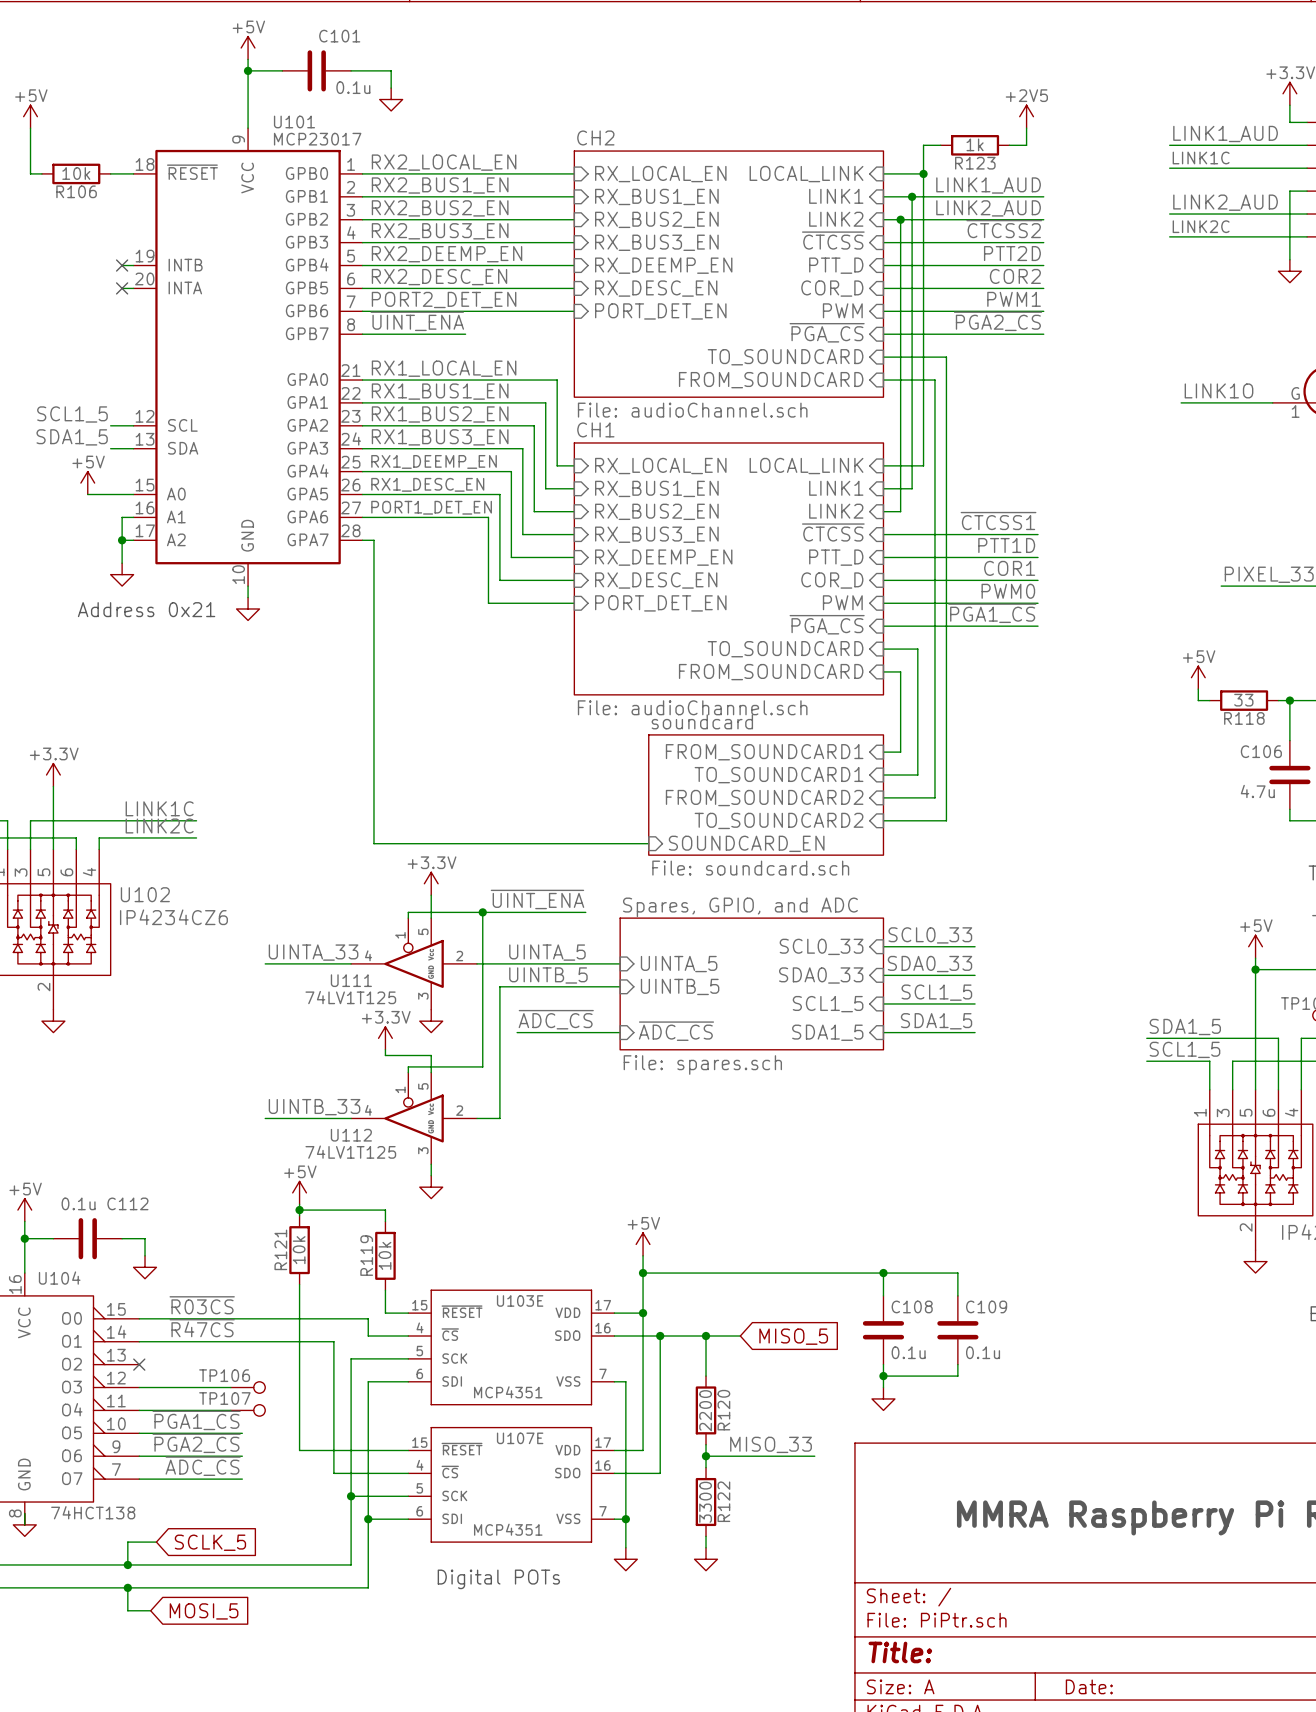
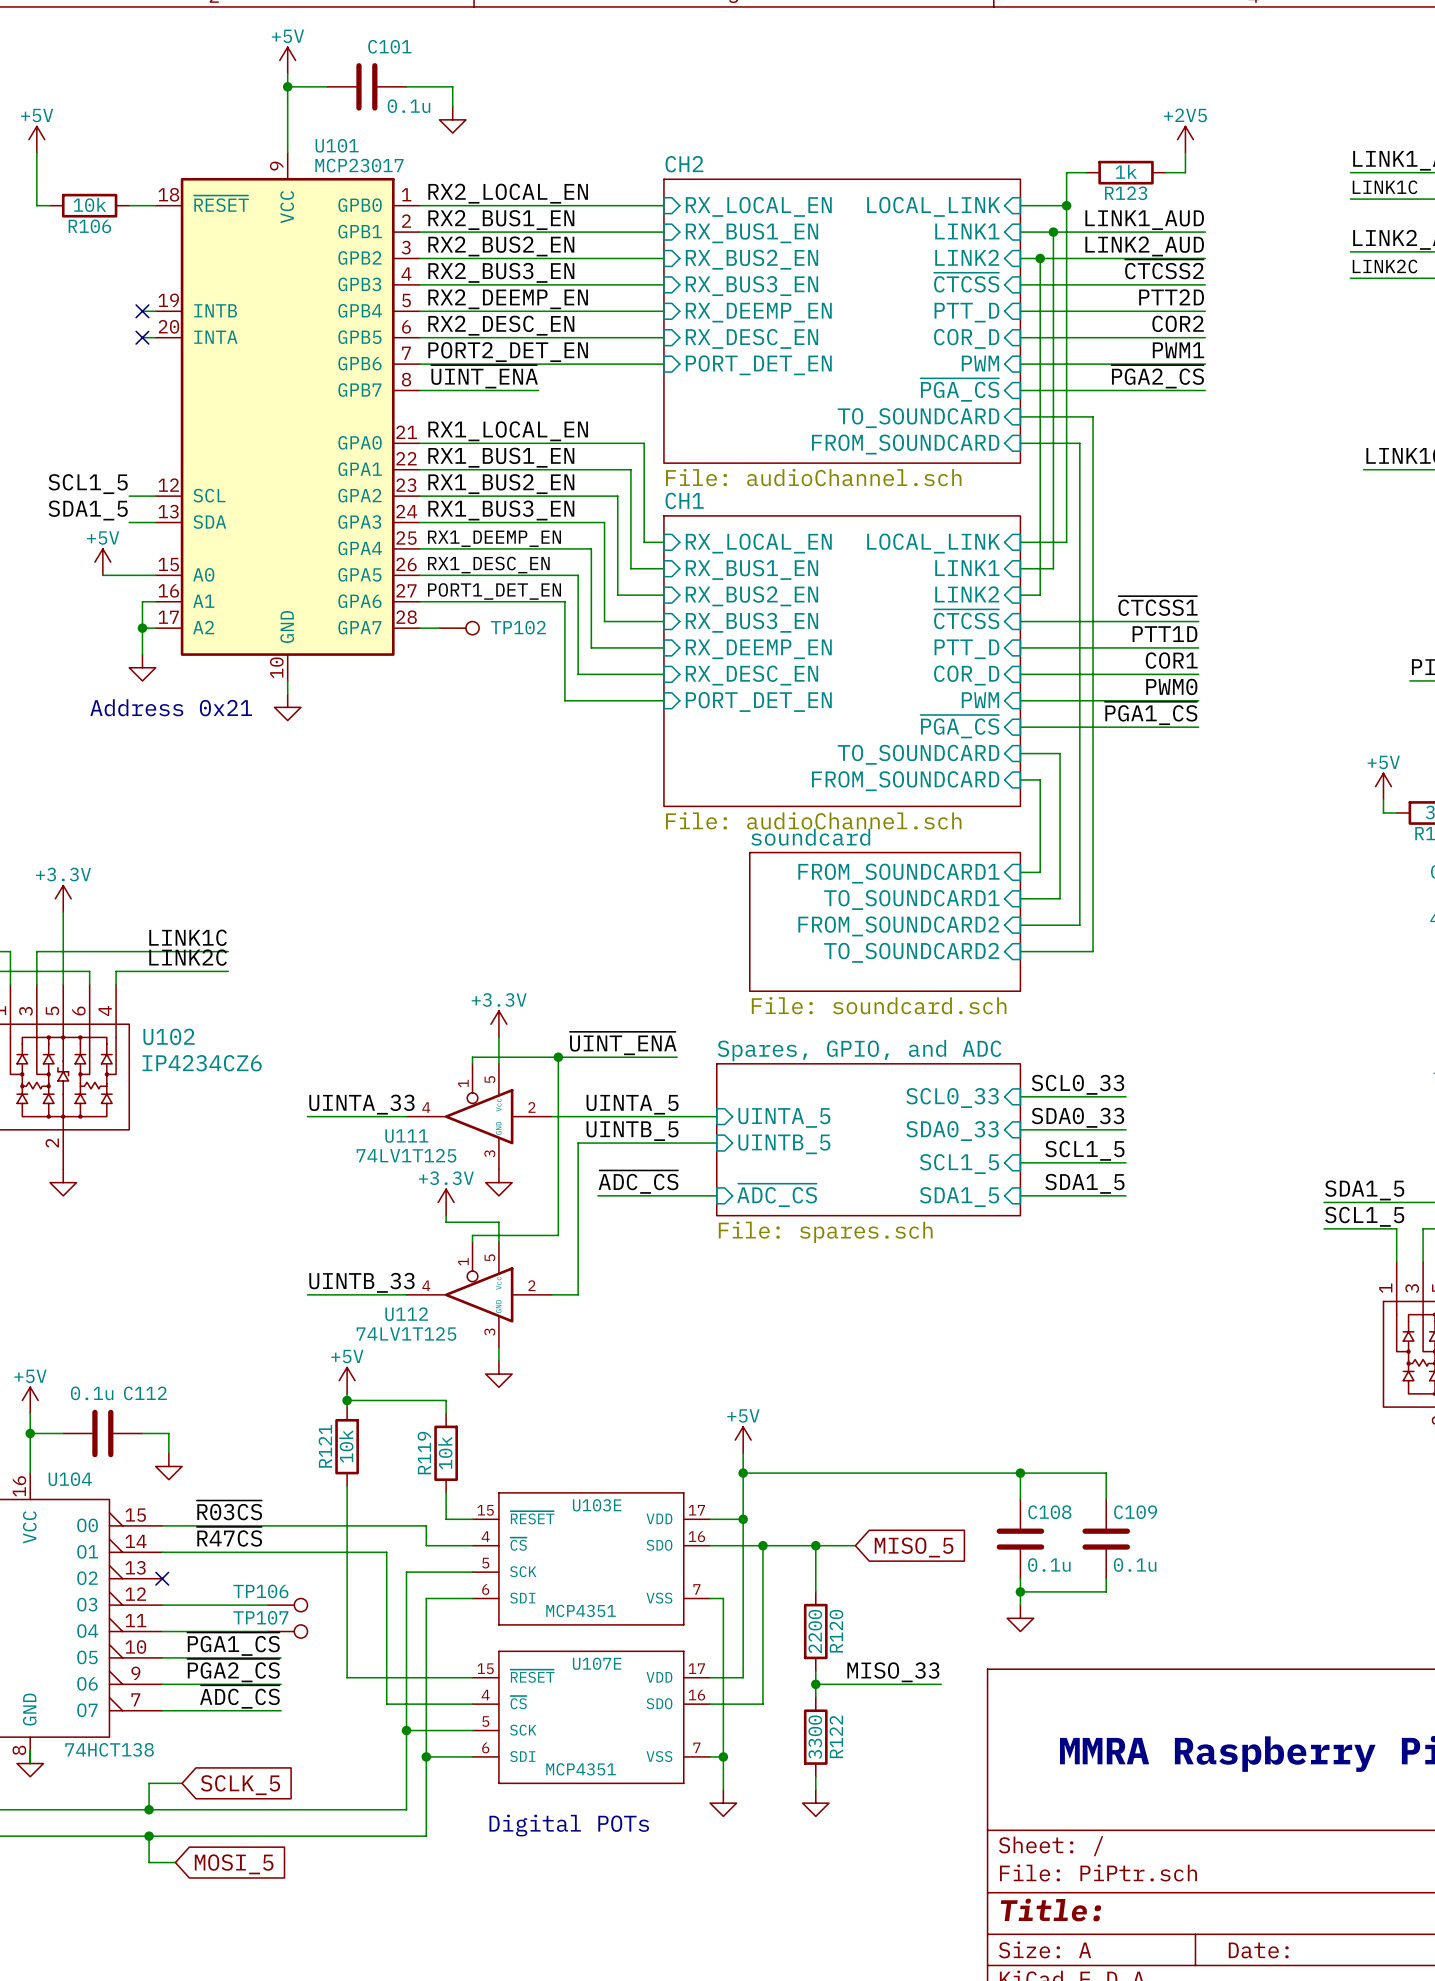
wire: (373, 540) (373, 843) (648, 843) -> (432, 628) (439, 628)
TP102: none -> (459, 628)
sheet pin: SOUNDCARD_EN (746, 843) -> none

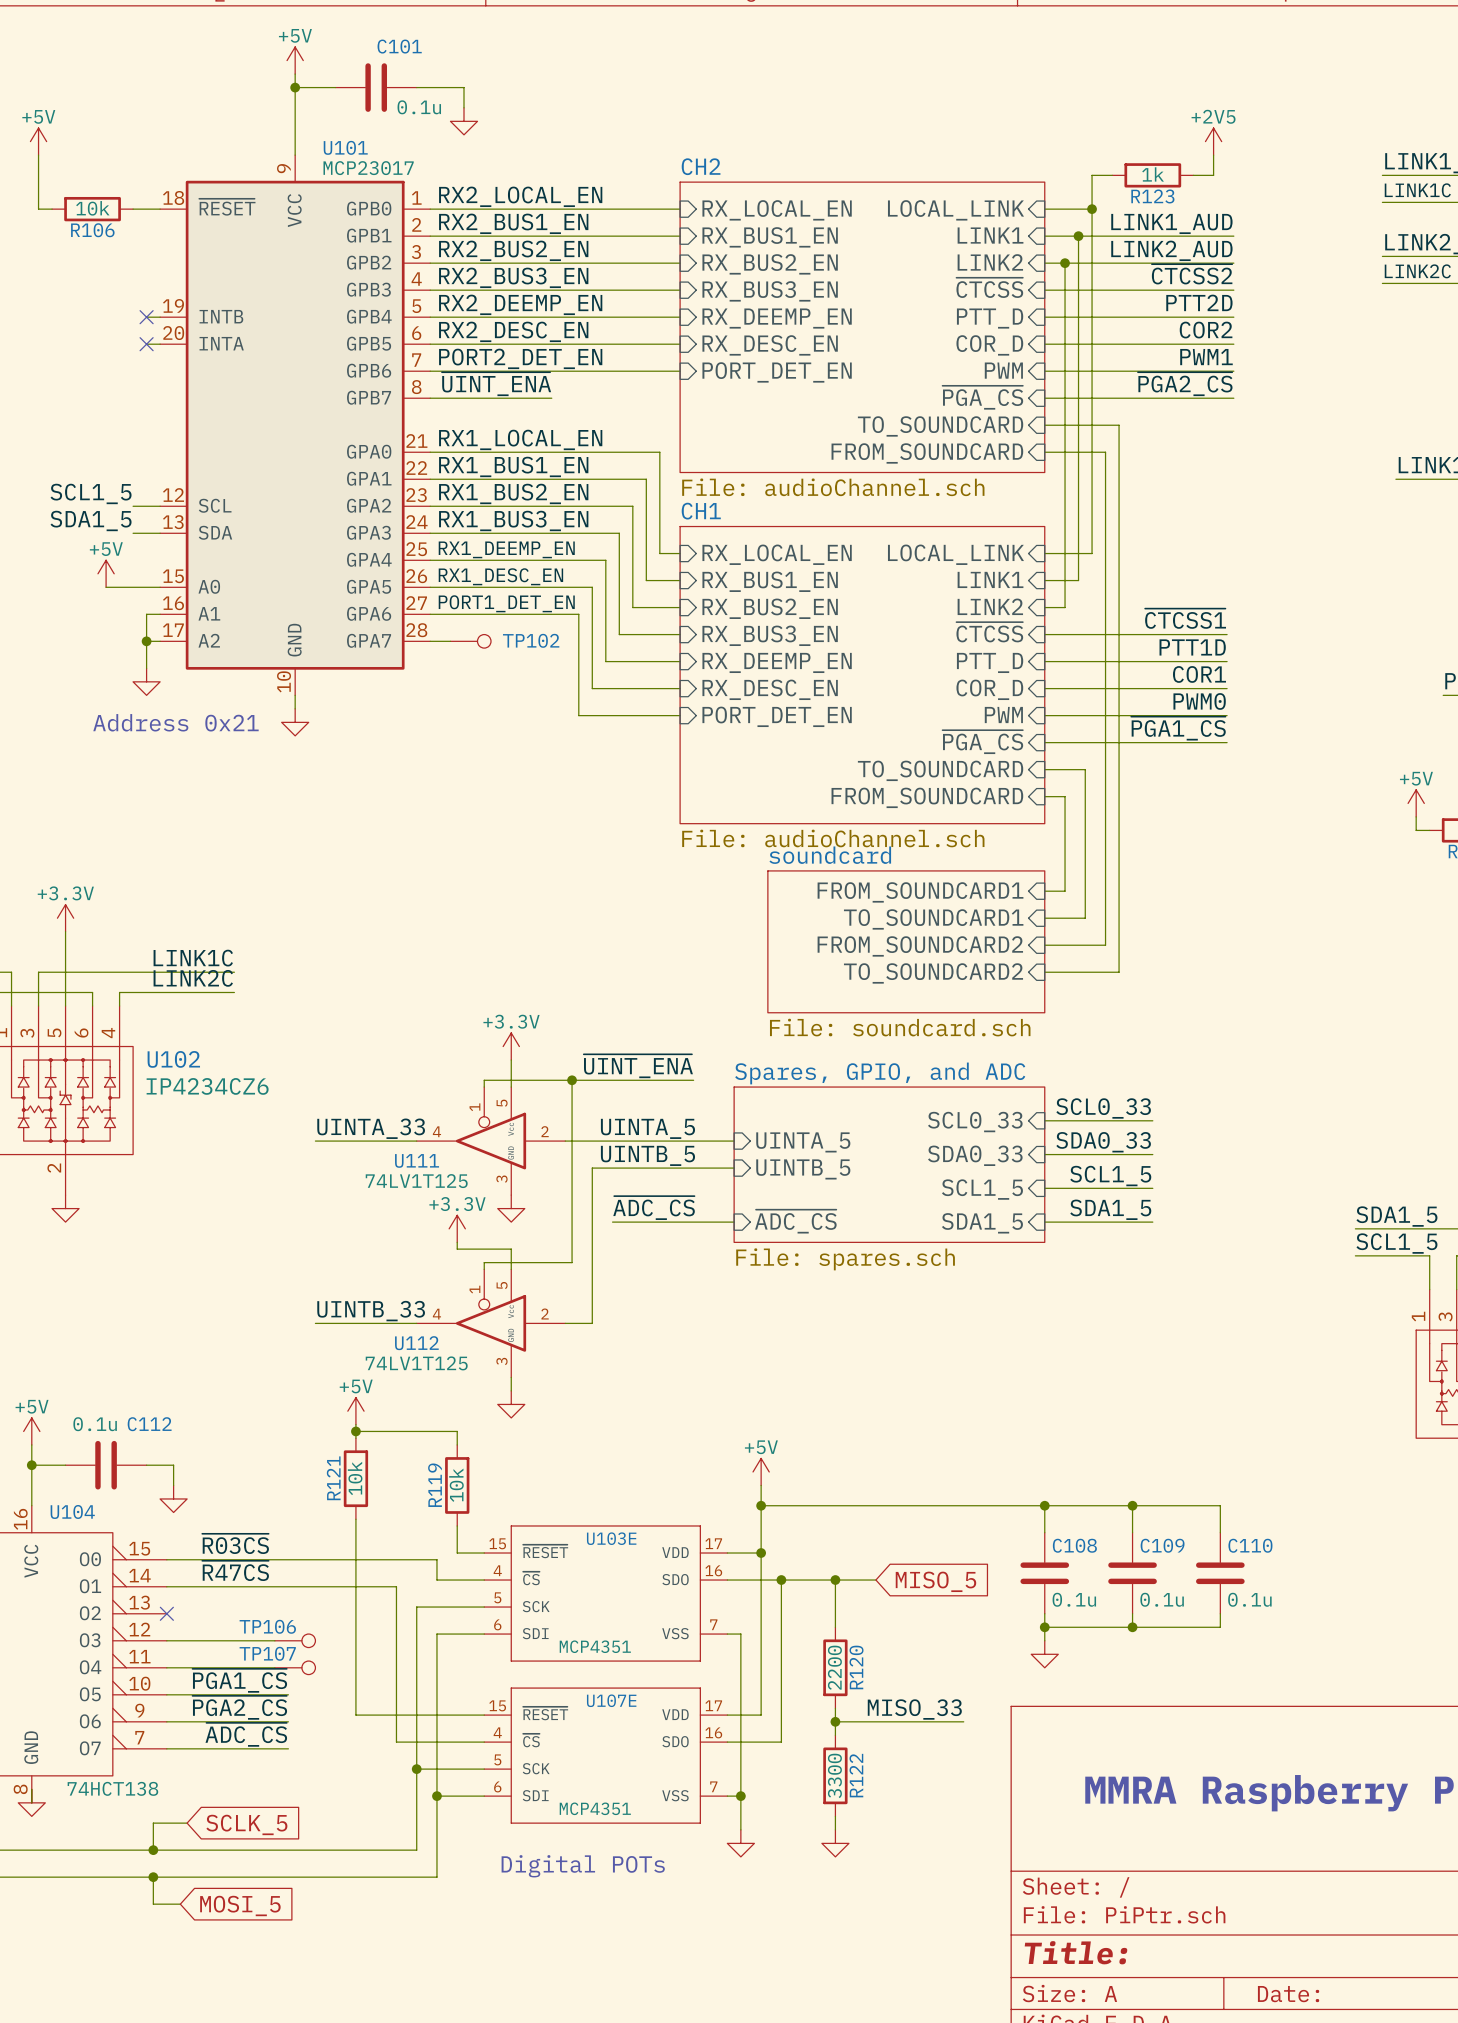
wire: none -> (1132, 1505) (1220, 1505) (1220, 1532)
junction: none -> (1132, 1505)
C110: none -> 0.1u (1220, 1573)
wire: none -> (1220, 1613) (1220, 1627) (1132, 1627)
junction: none -> (1132, 1627)

